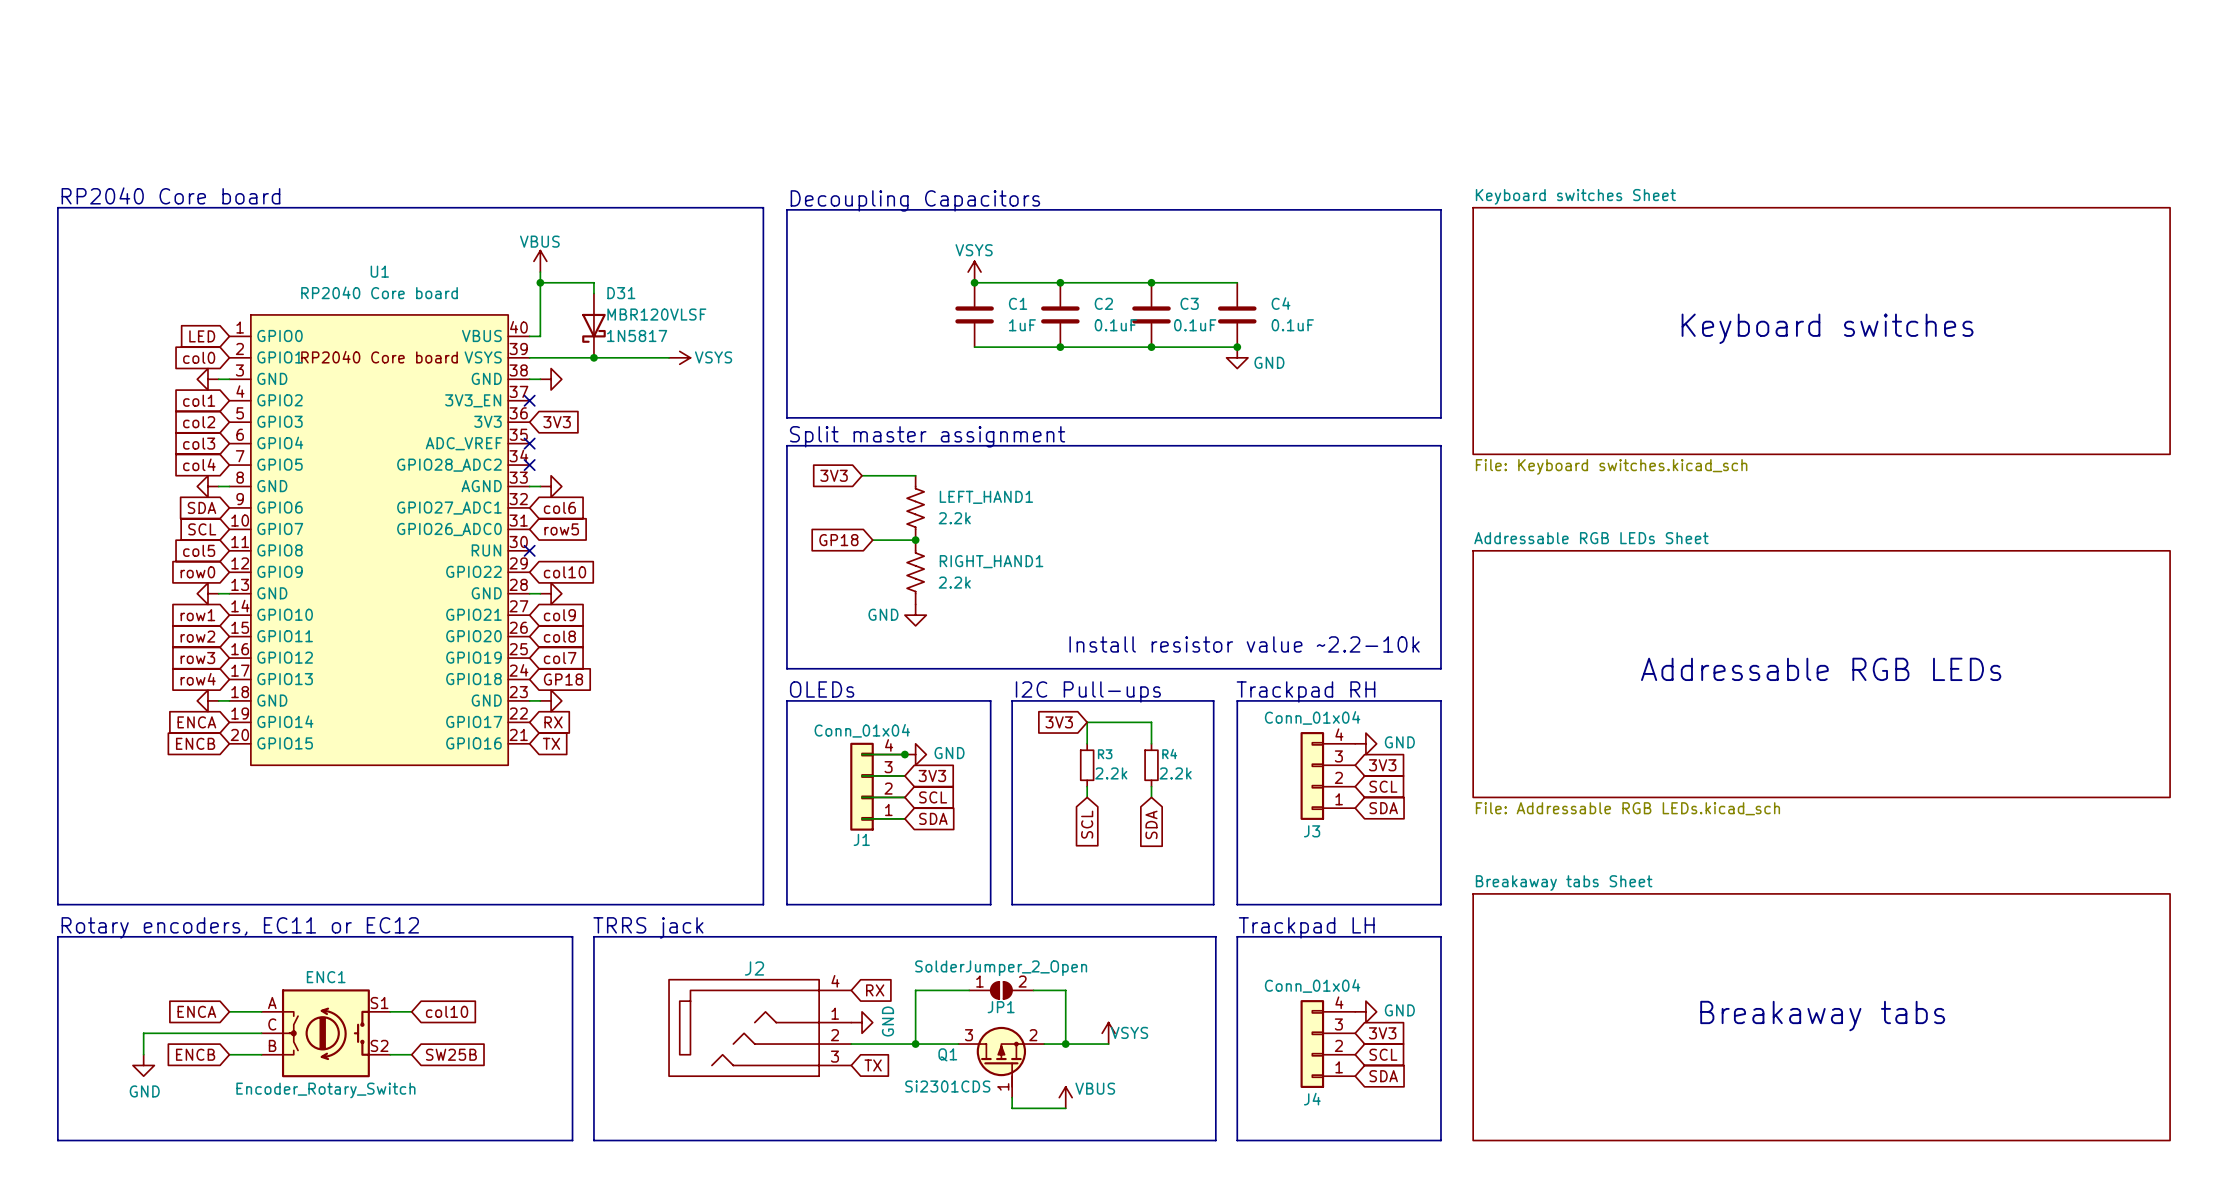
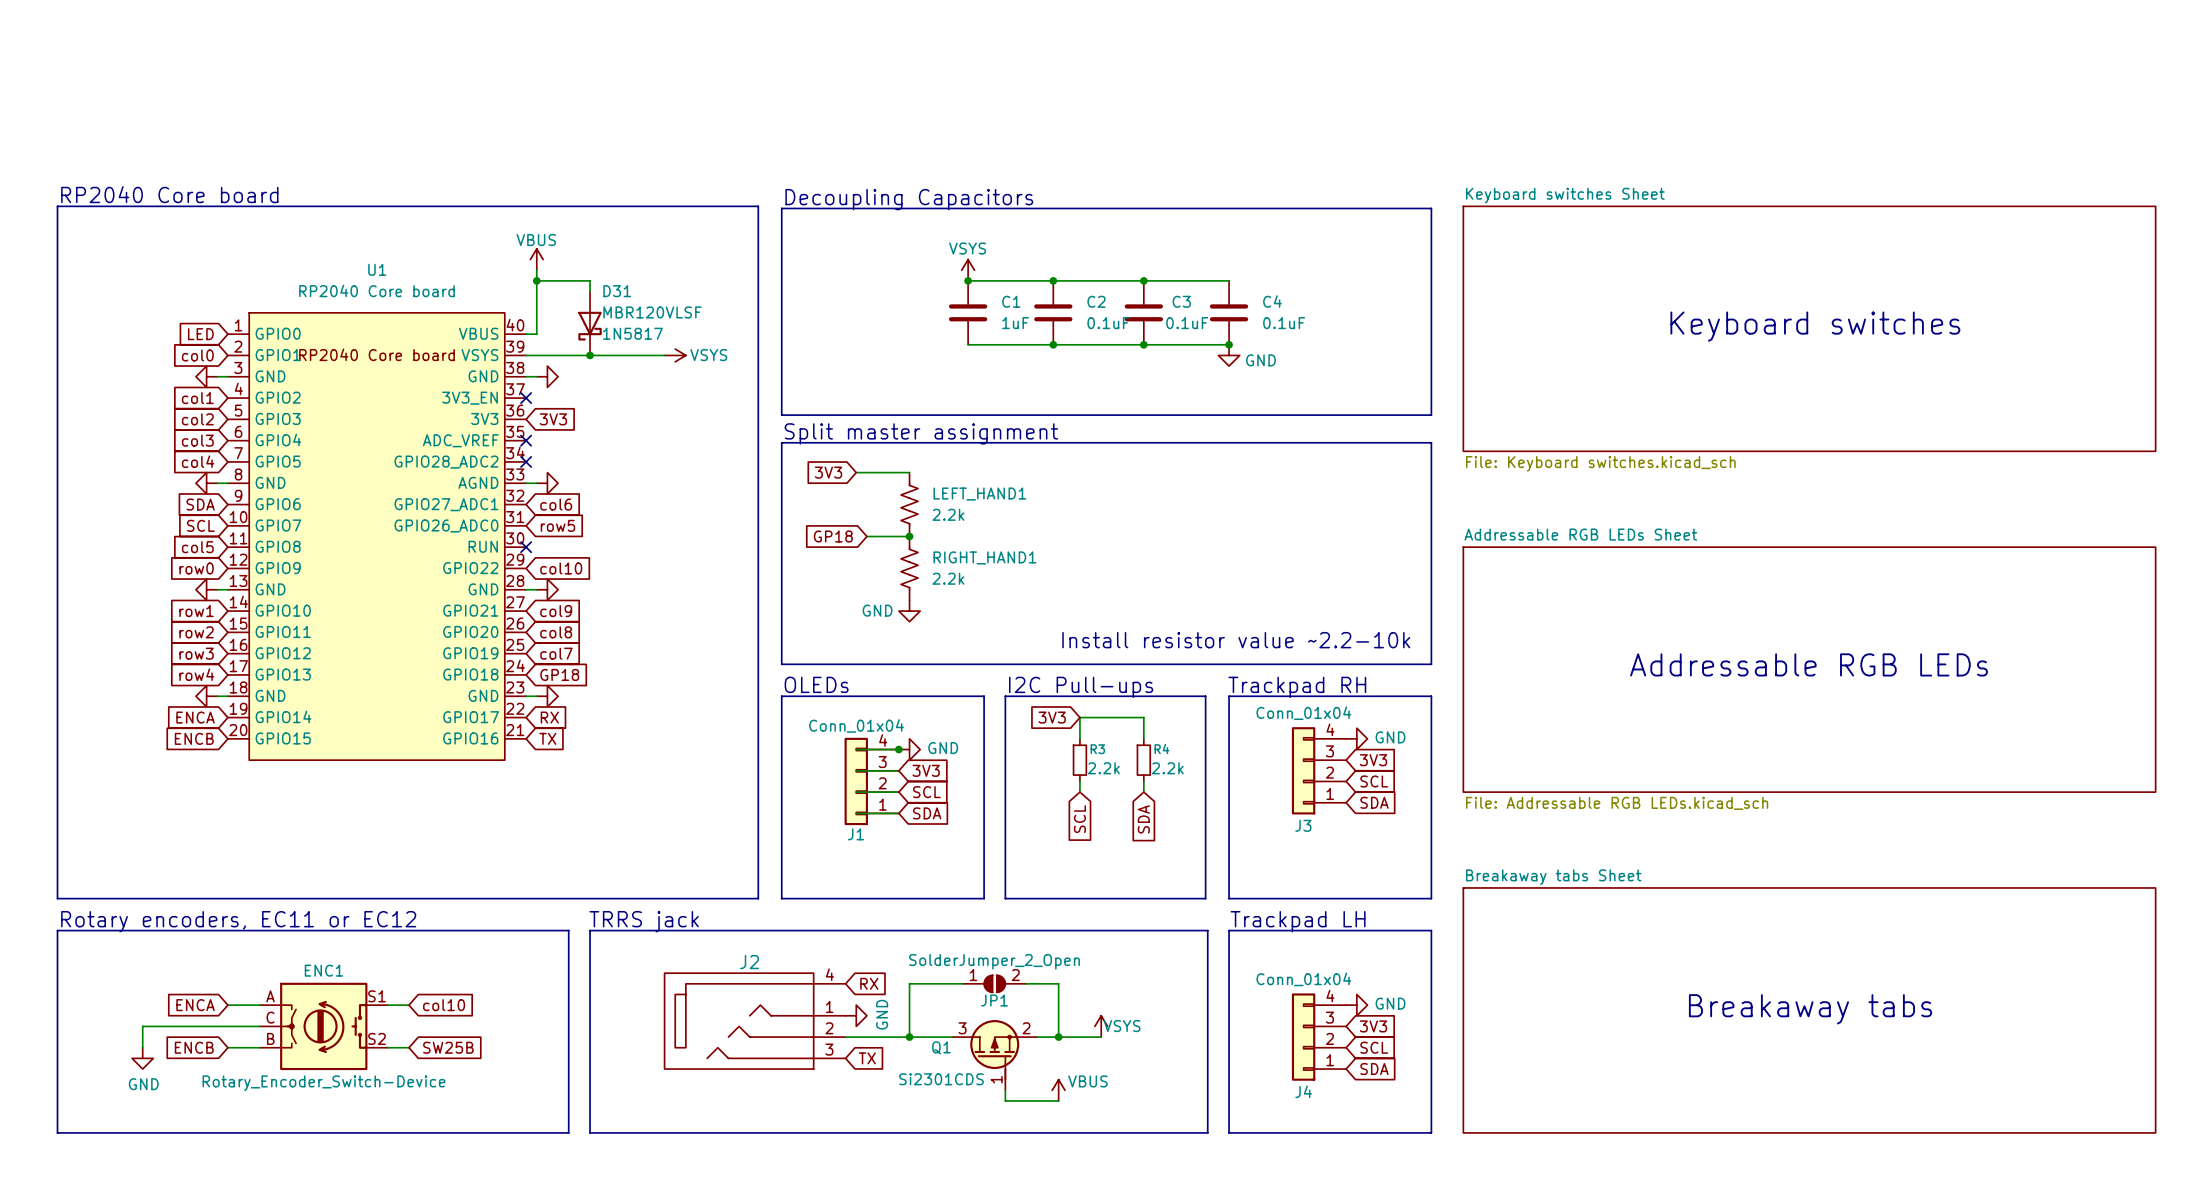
ENC1 value: Encoder_Rotary_Switch (325, 1090) -> Rotary_Encoder_Switch-Device (324, 1083)

